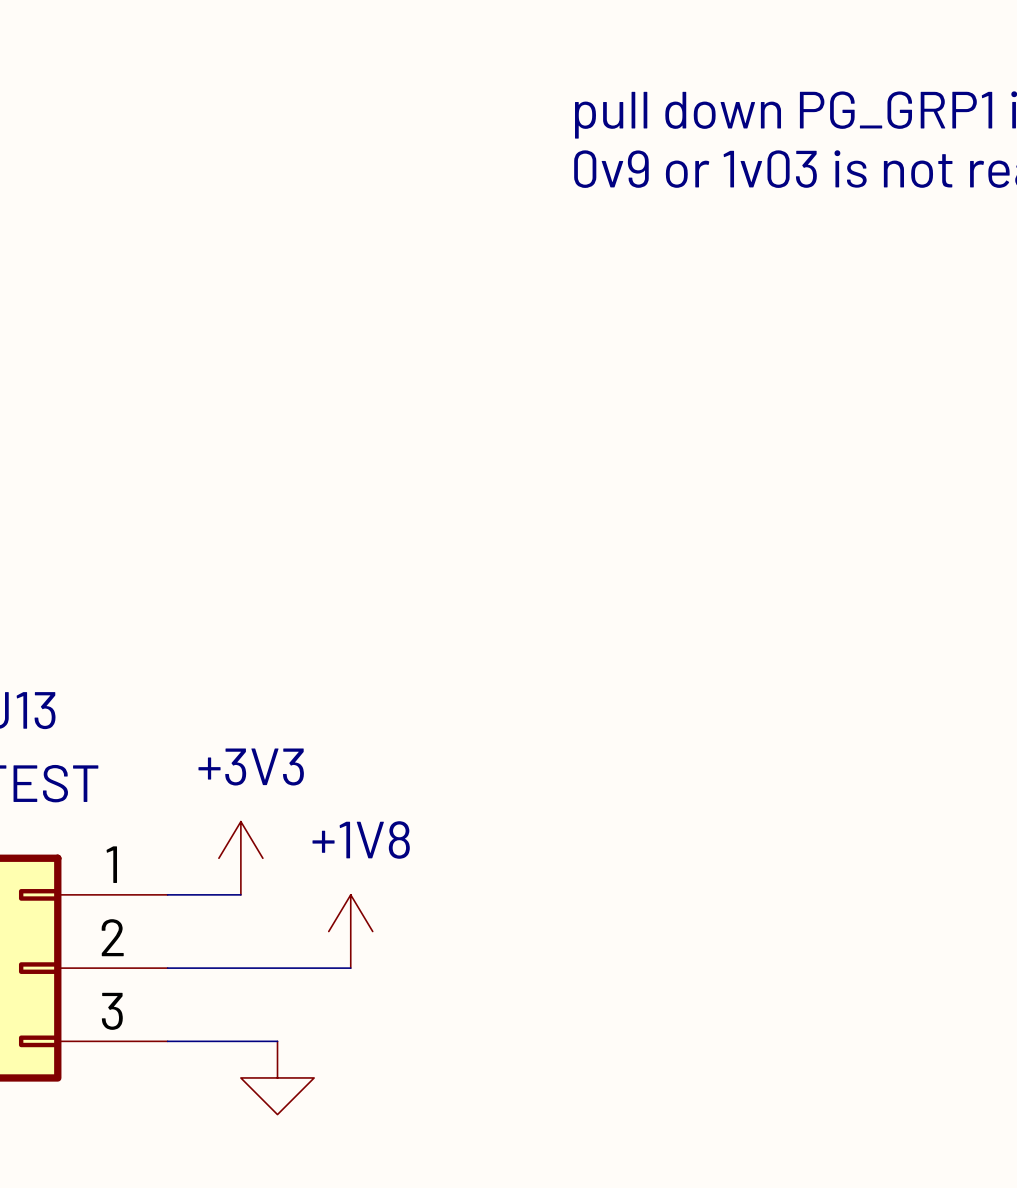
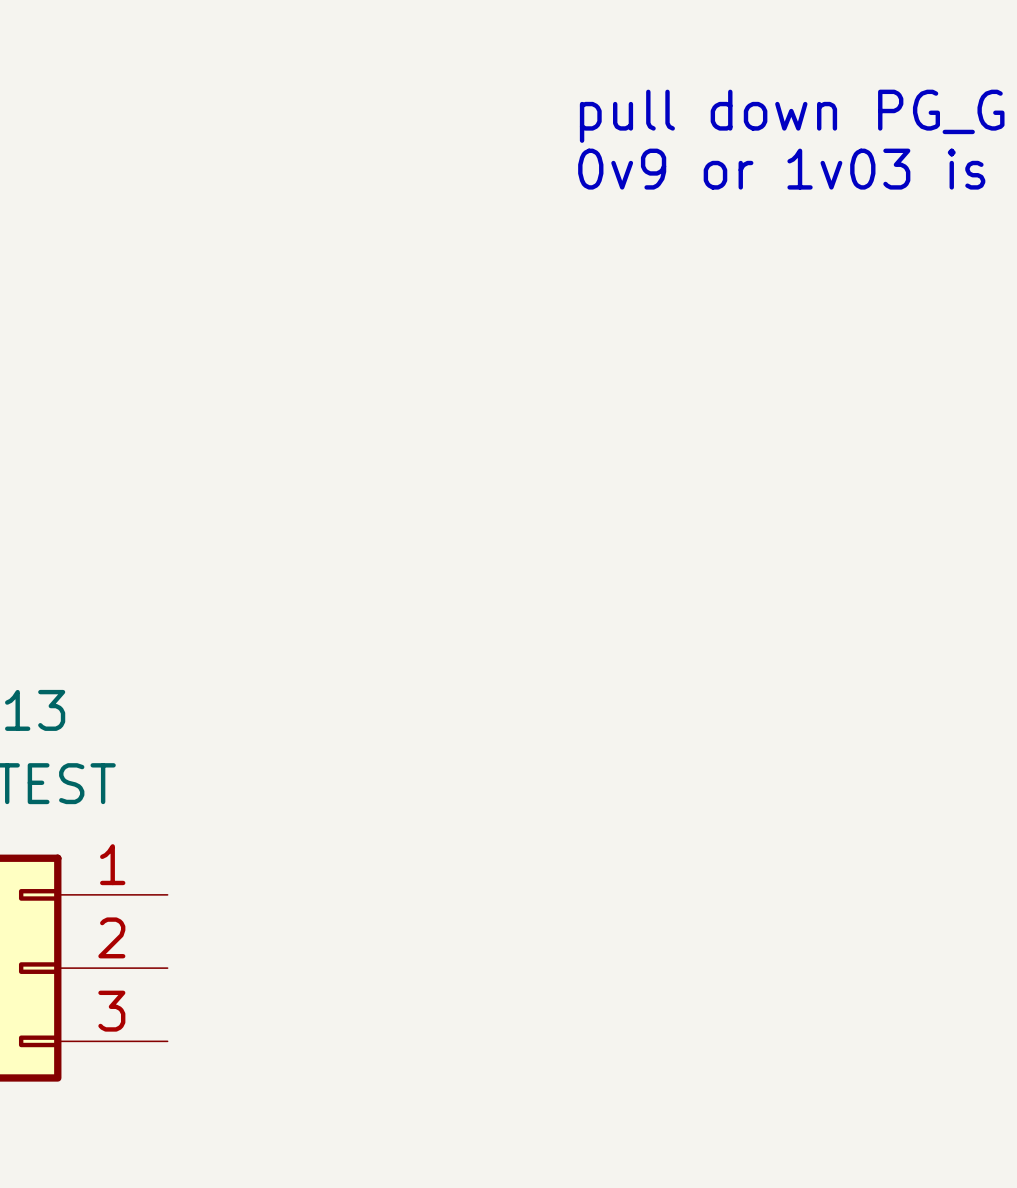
power symbol: +3V3 (240, 858) -> none
wire: (167, 894) (240, 894) -> none
power symbol: +1V8 (350, 931) -> none
wire: (167, 968) (350, 968) -> none
wire: (167, 1041) (277, 1041) -> none
power symbol: (277, 1077) -> none

